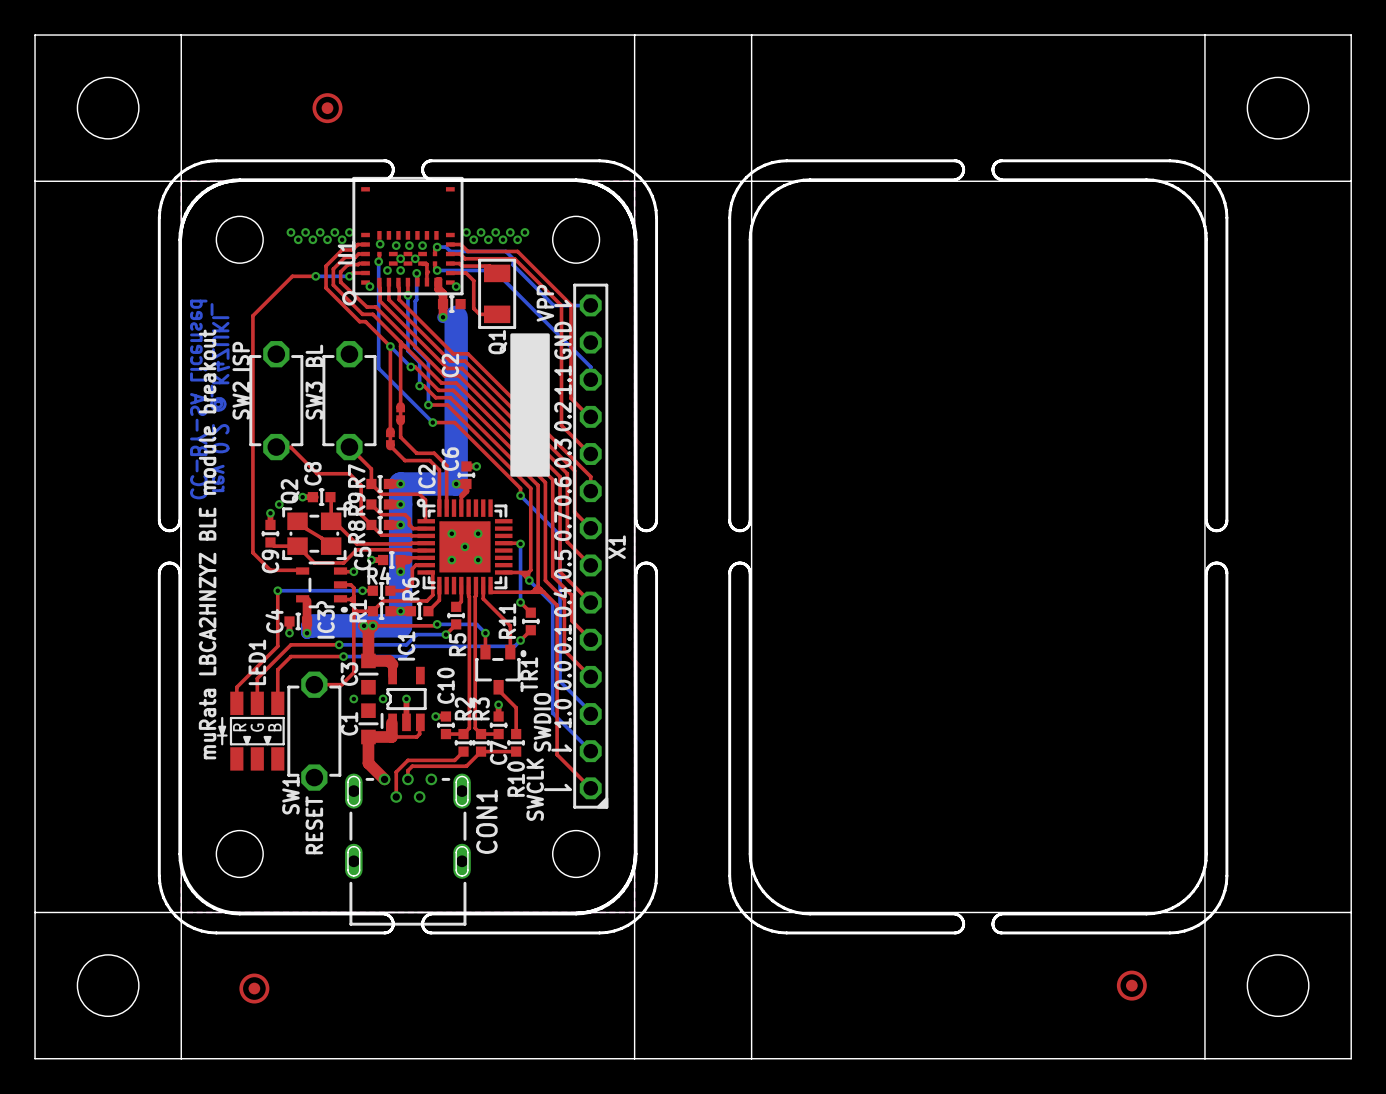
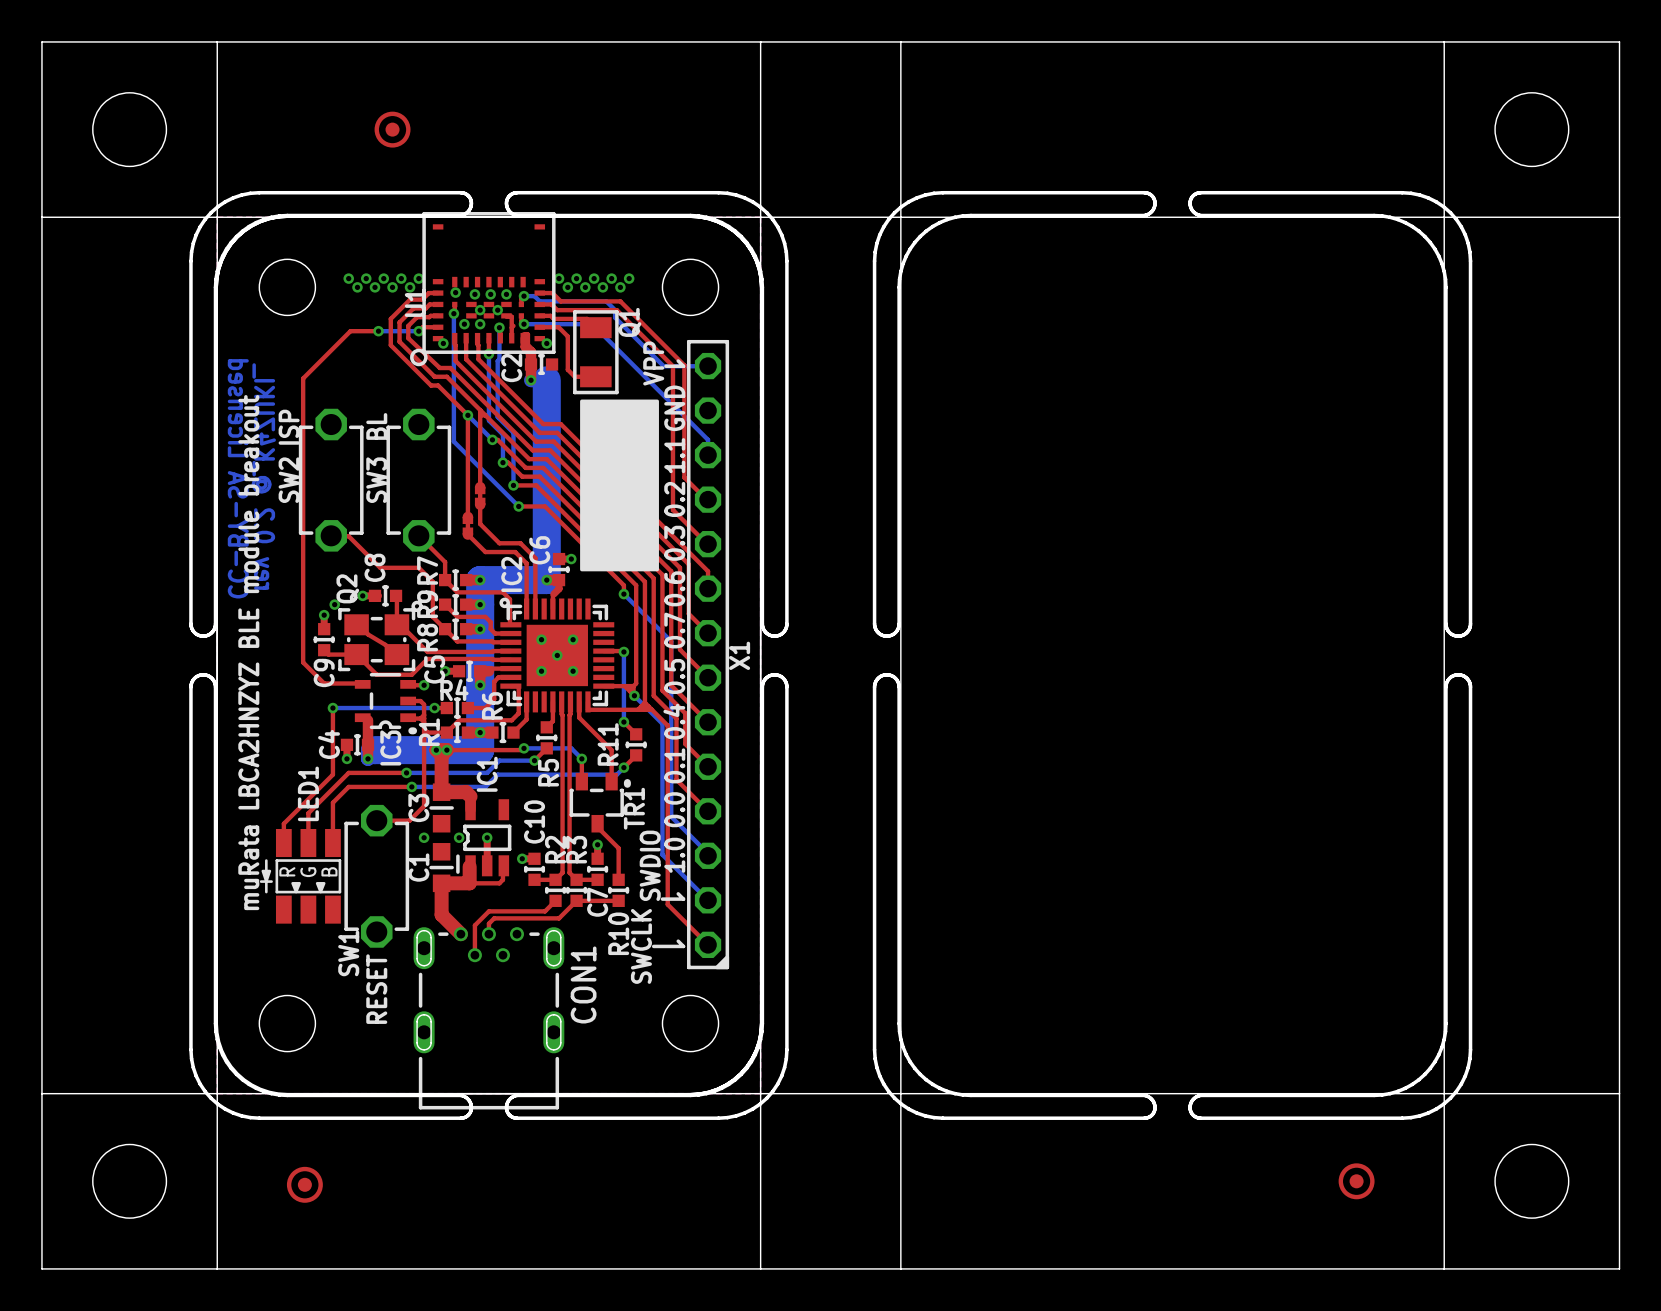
drawing shape: [510, 333, 550, 477] -> [580, 399, 659, 572]
Q1 name position: Q1 (497, 342) -> Q1 (630, 322)
C2 name position: C2 (450, 365) -> C2 (511, 368)

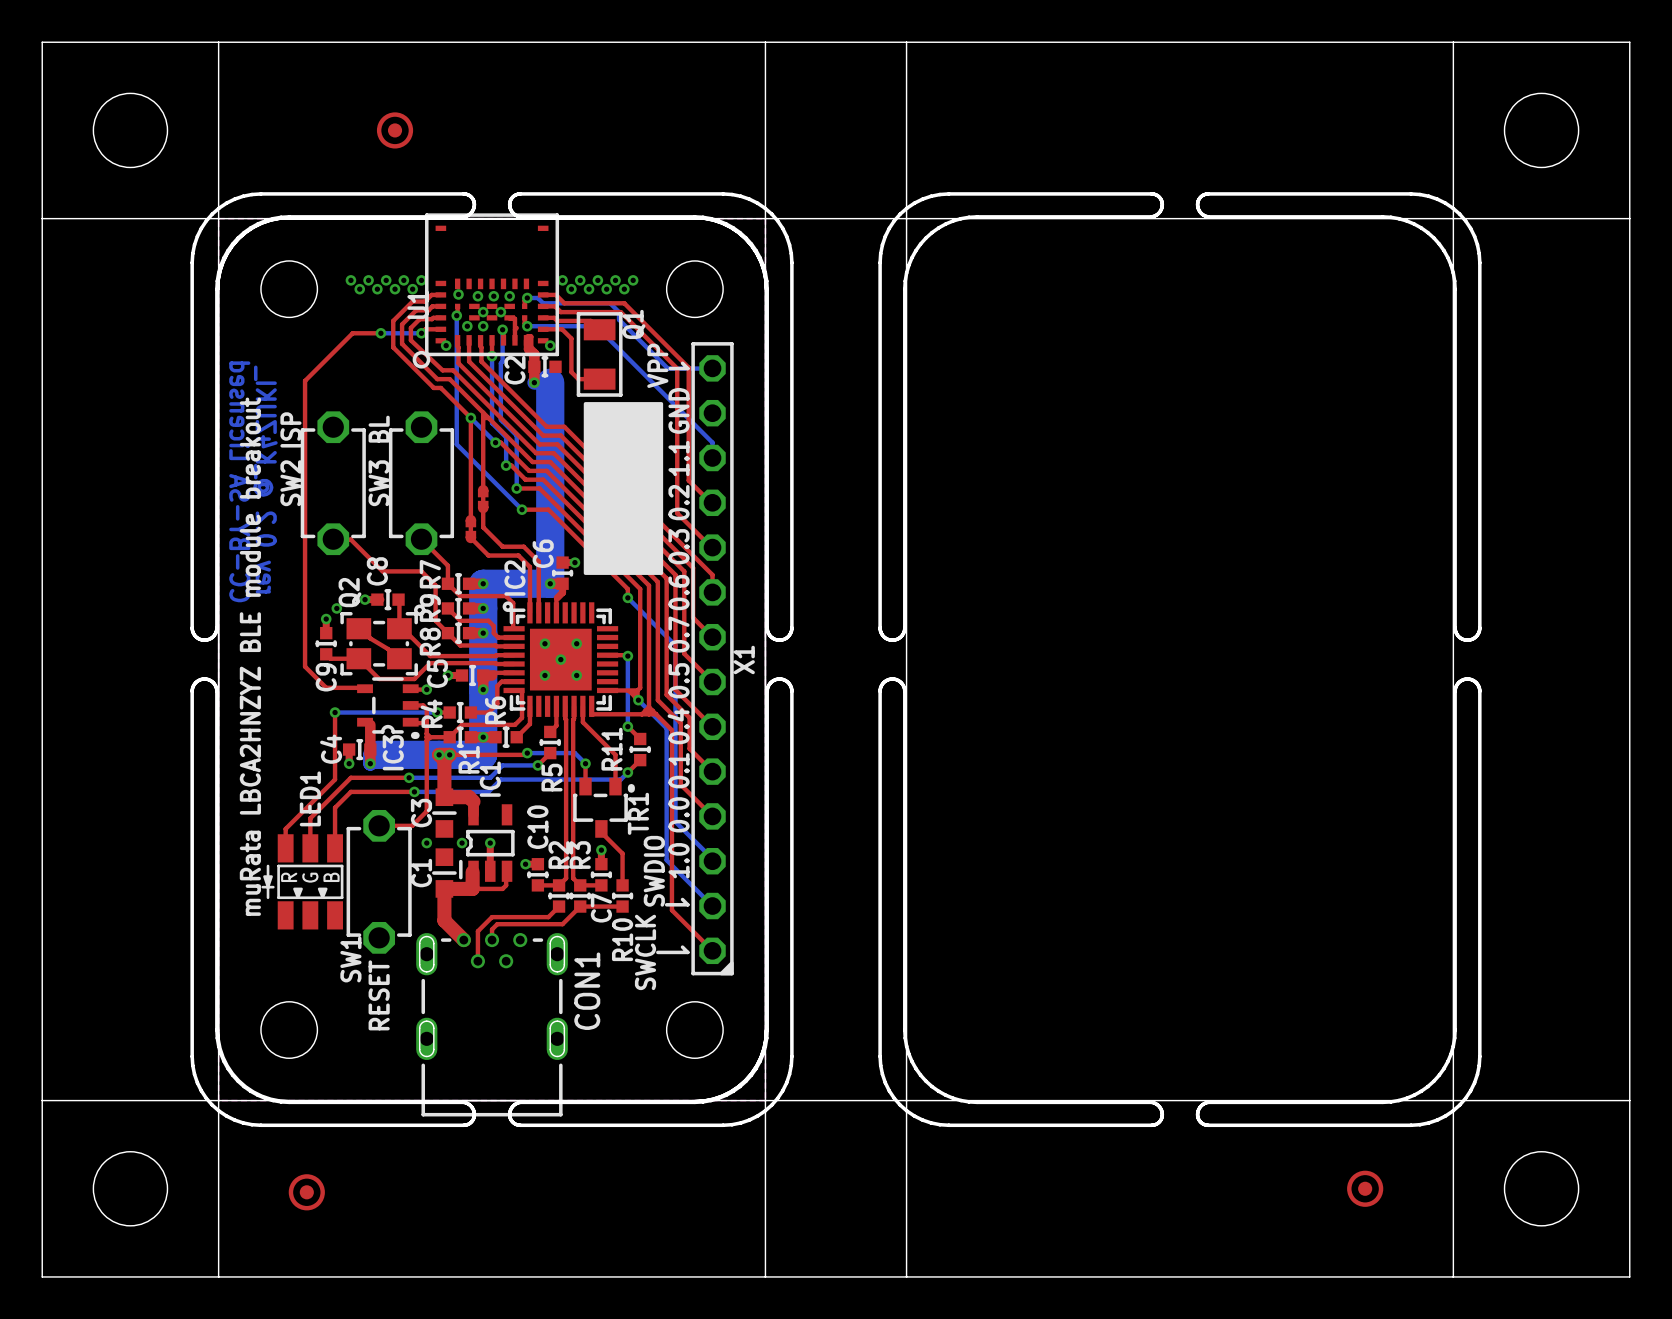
R4 name rotation: 0° (454, 690) -> 90° counterclockwise (431, 713)
R1 name position: R1 (429, 732) -> R1 (469, 759)

